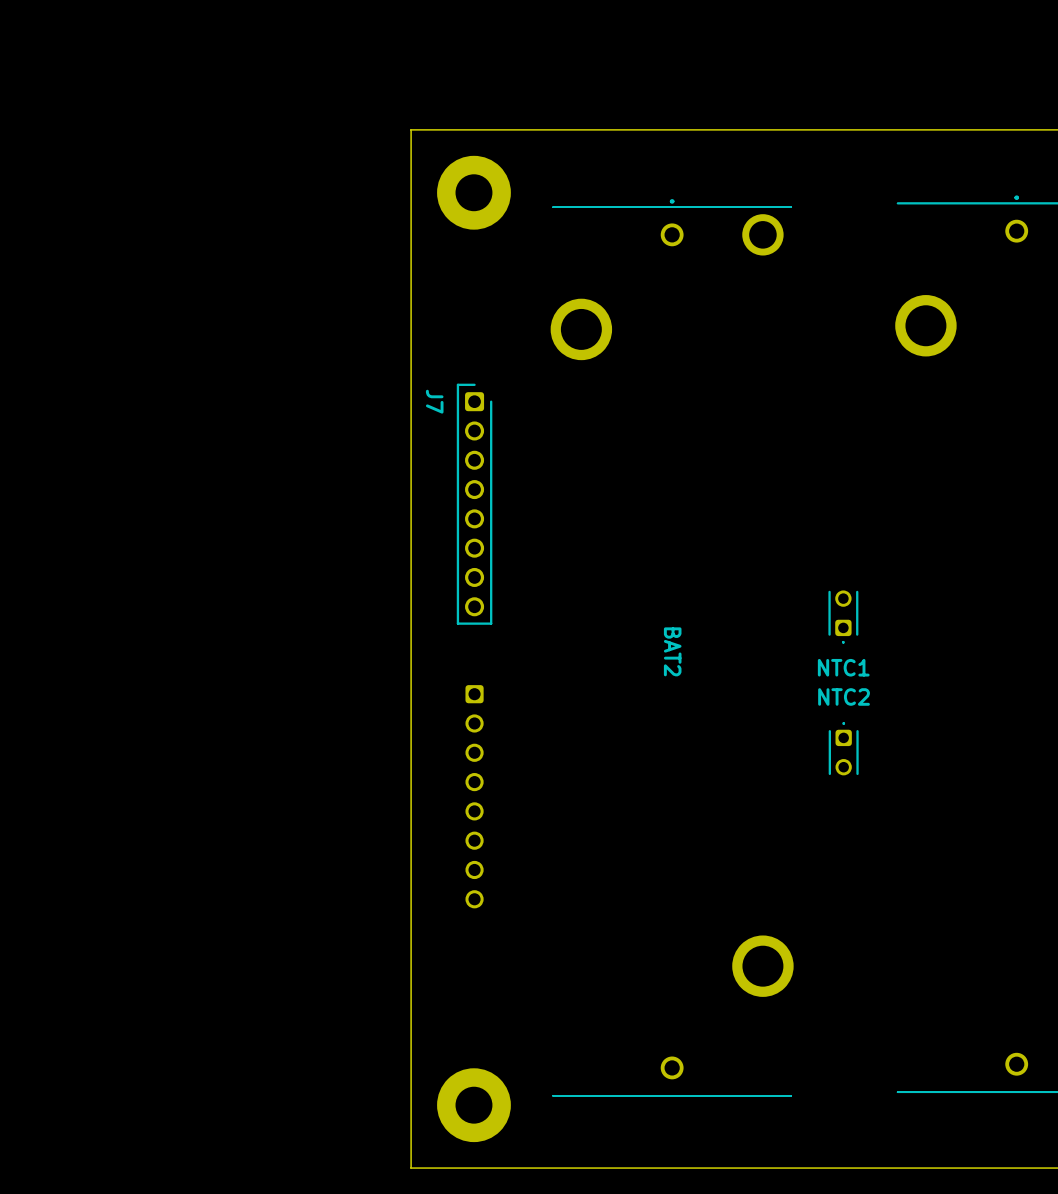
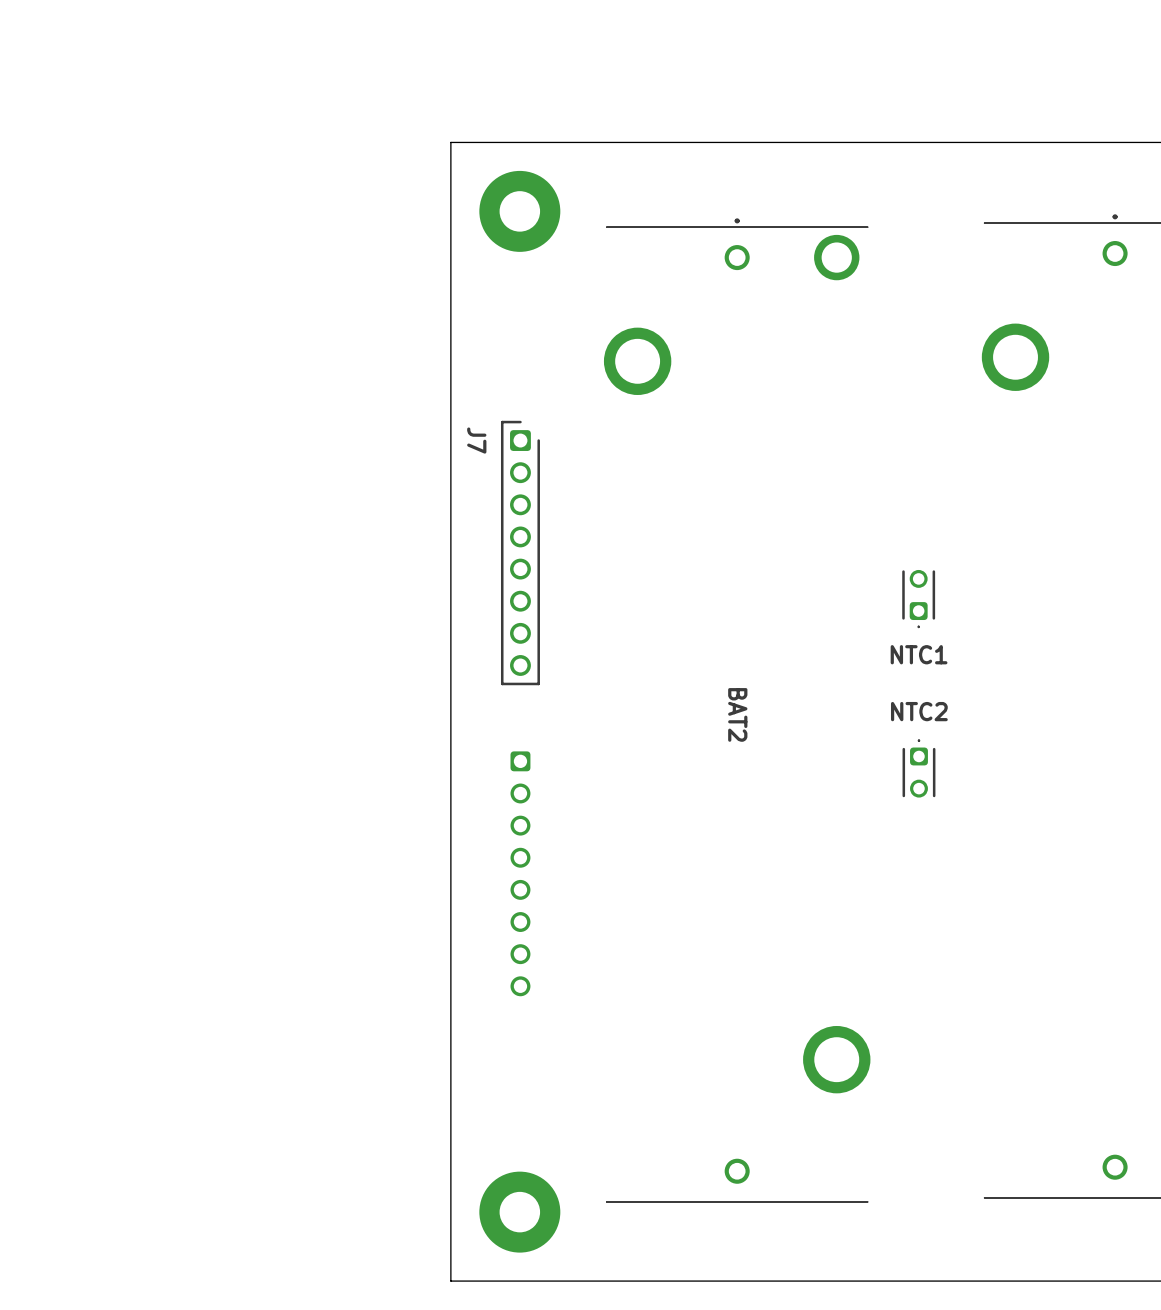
NTC1 position: (843, 616) -> (918, 599)
NTC2 position: (843, 748) -> (918, 768)

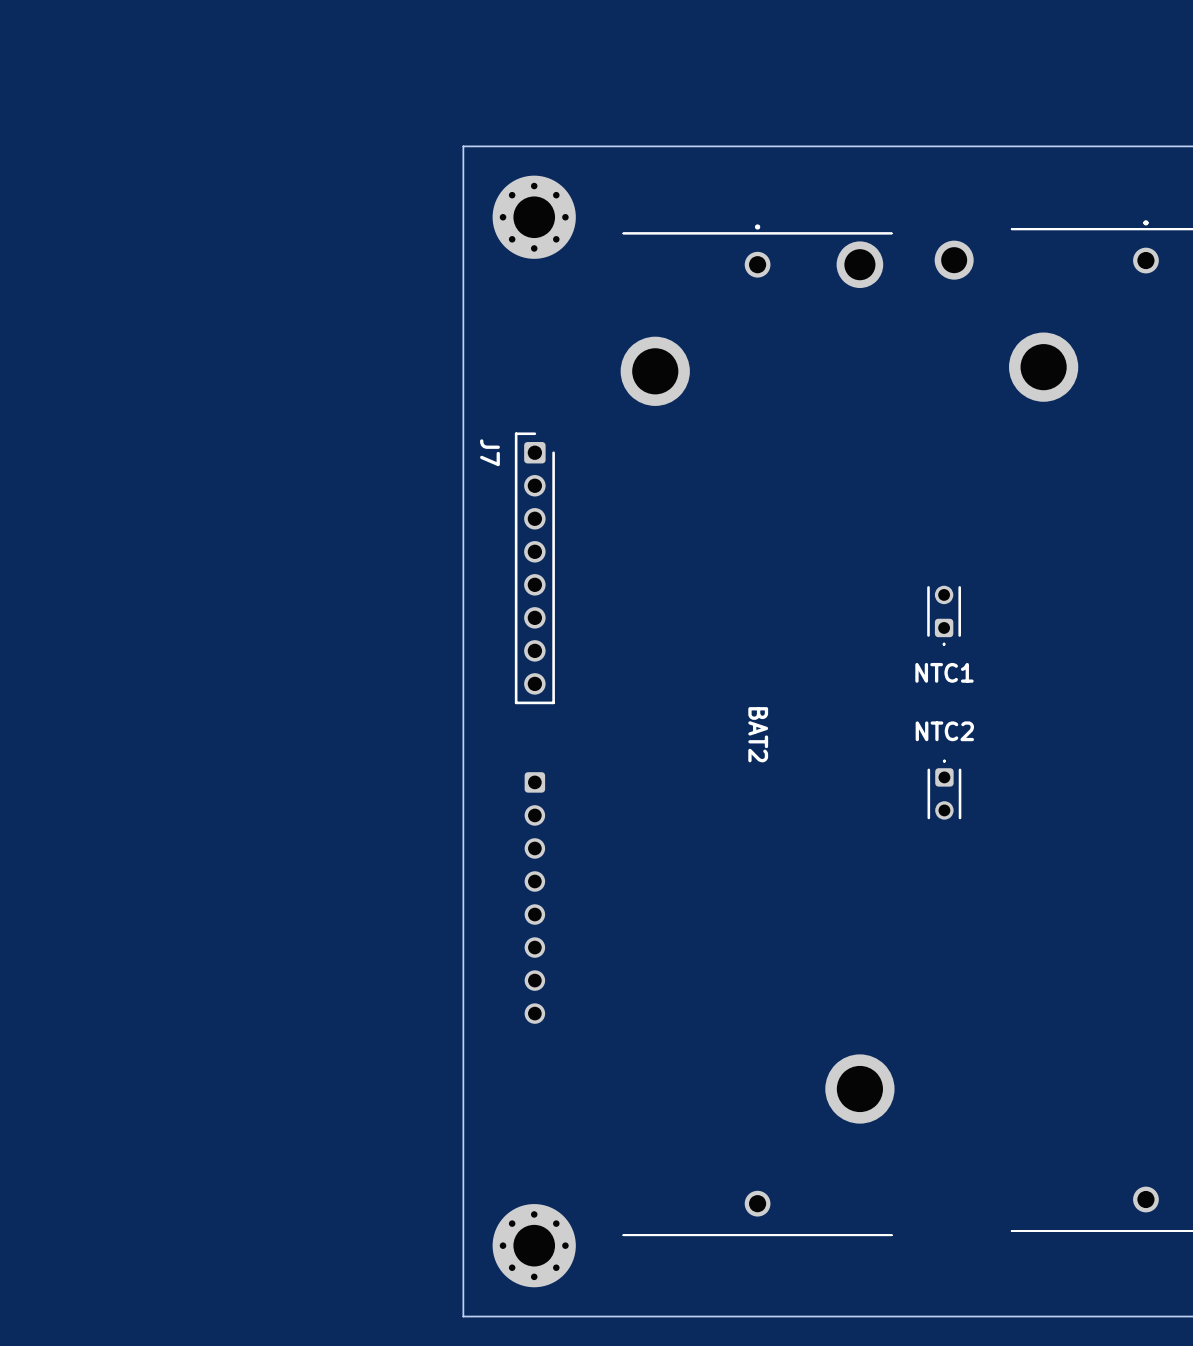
part footprint: [479, 170, 561, 252] -> [492, 175, 576, 259]
part: none -> (954, 260)
part footprint: [479, 1171, 561, 1253] -> [492, 1204, 576, 1288]

